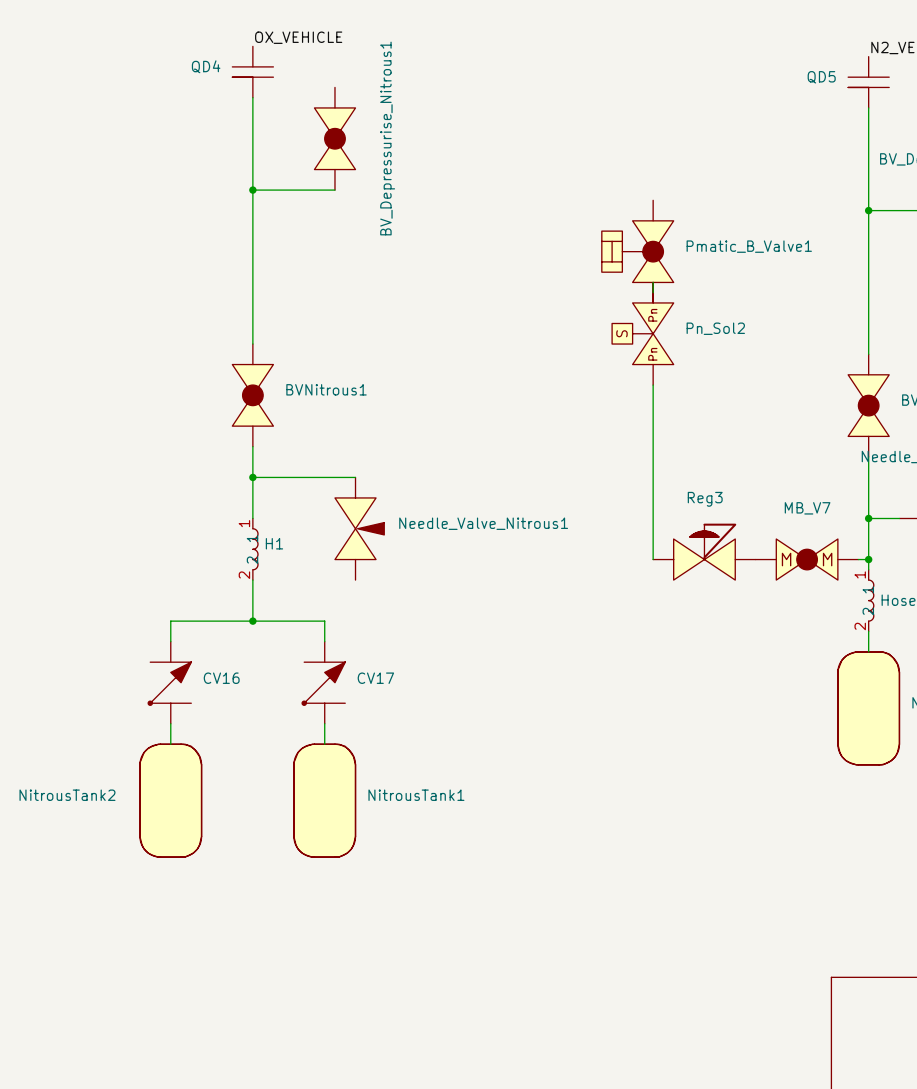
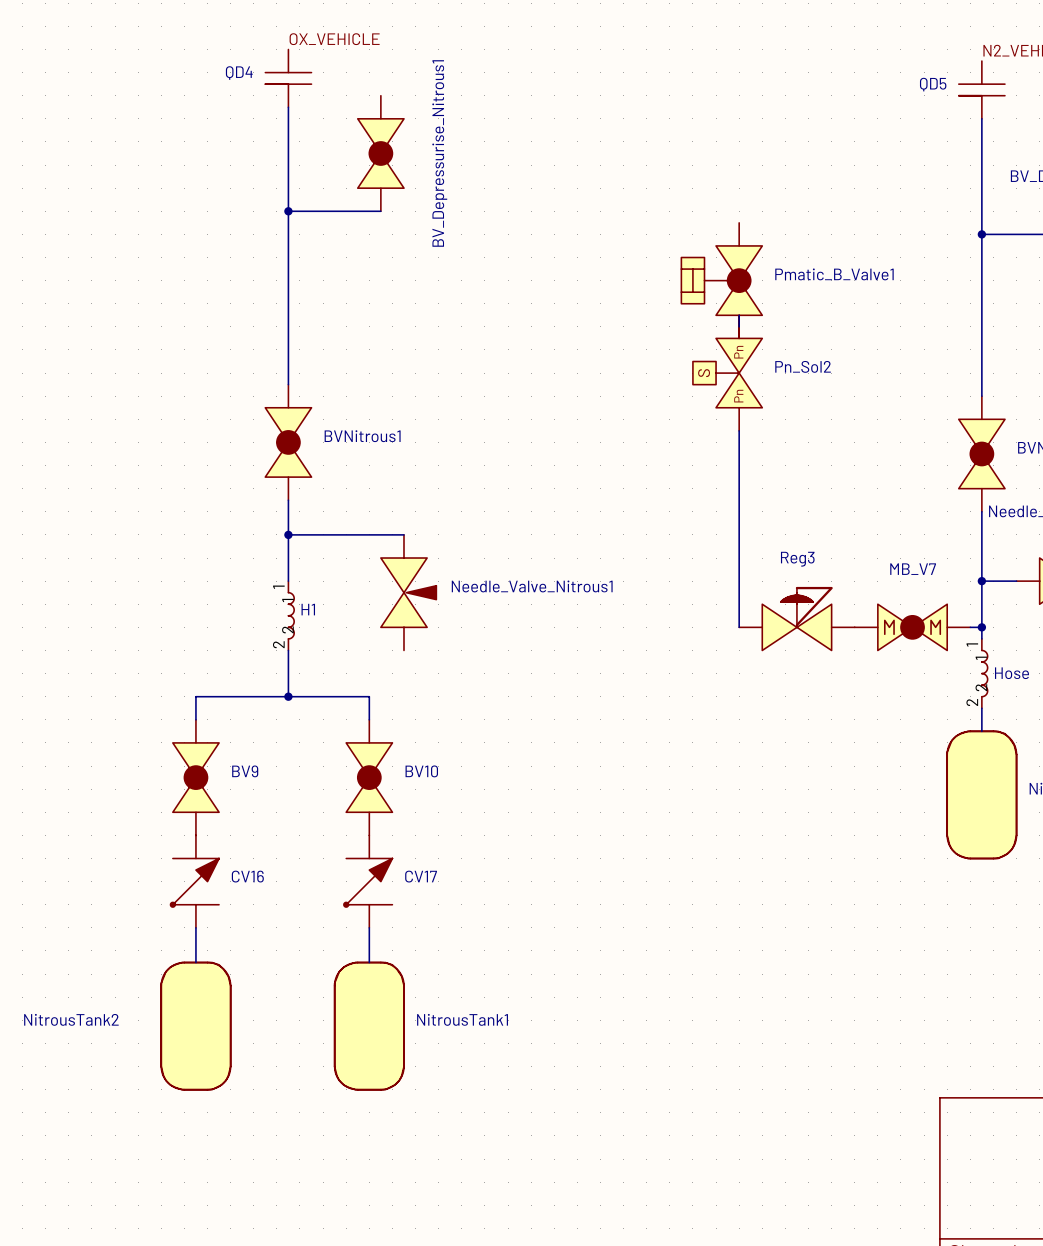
CV16 position: (169, 682) -> (194, 881)
CV17 position: (323, 682) -> (368, 881)
BV9: none -> (195, 777)
BV10: none -> (369, 777)
NitrousTank2 position: (170, 800) -> (195, 1026)
NitrousTank1 position: (324, 800) -> (369, 1026)

